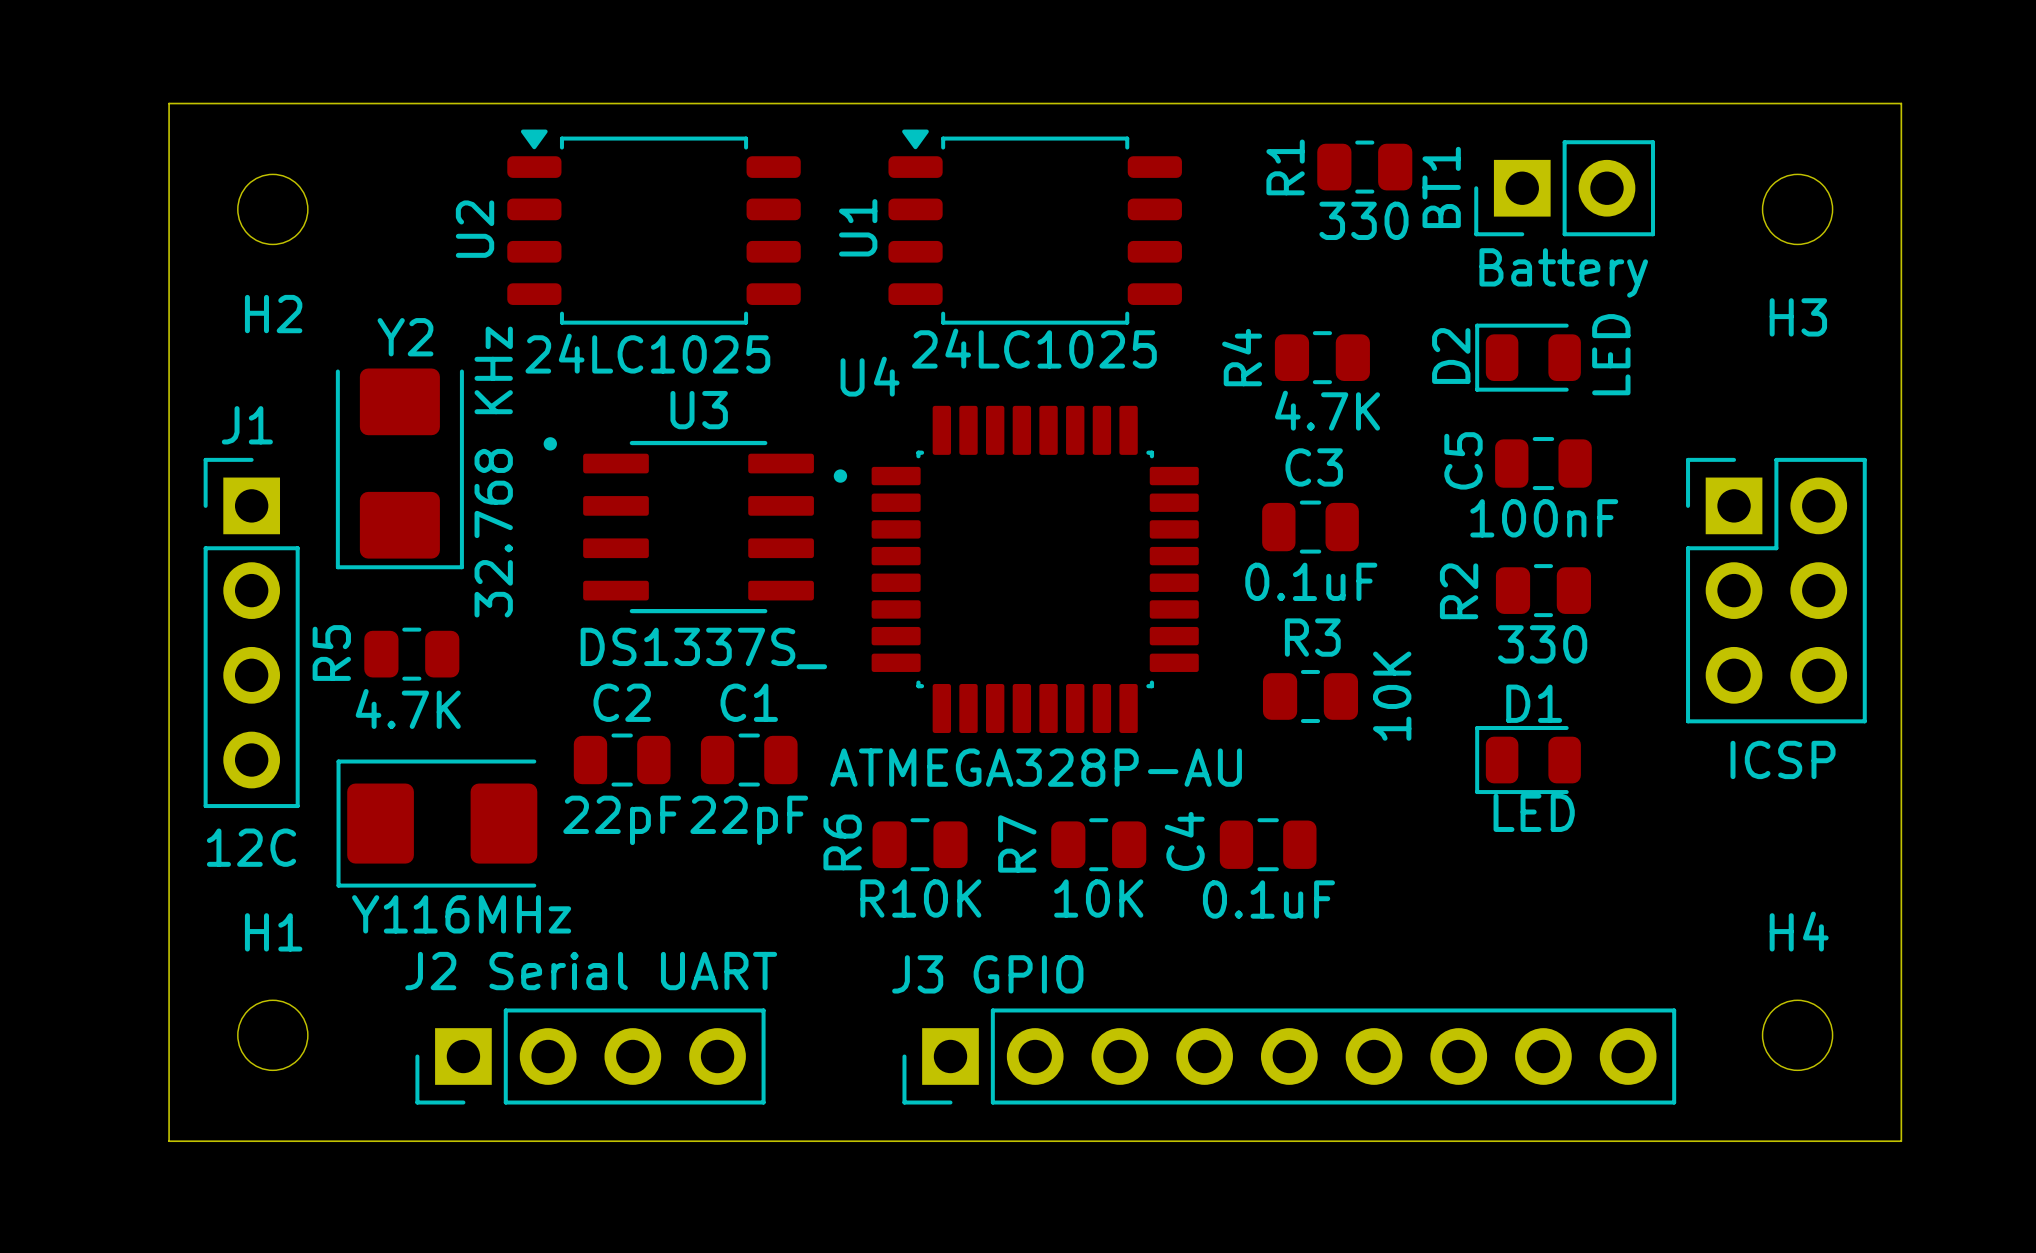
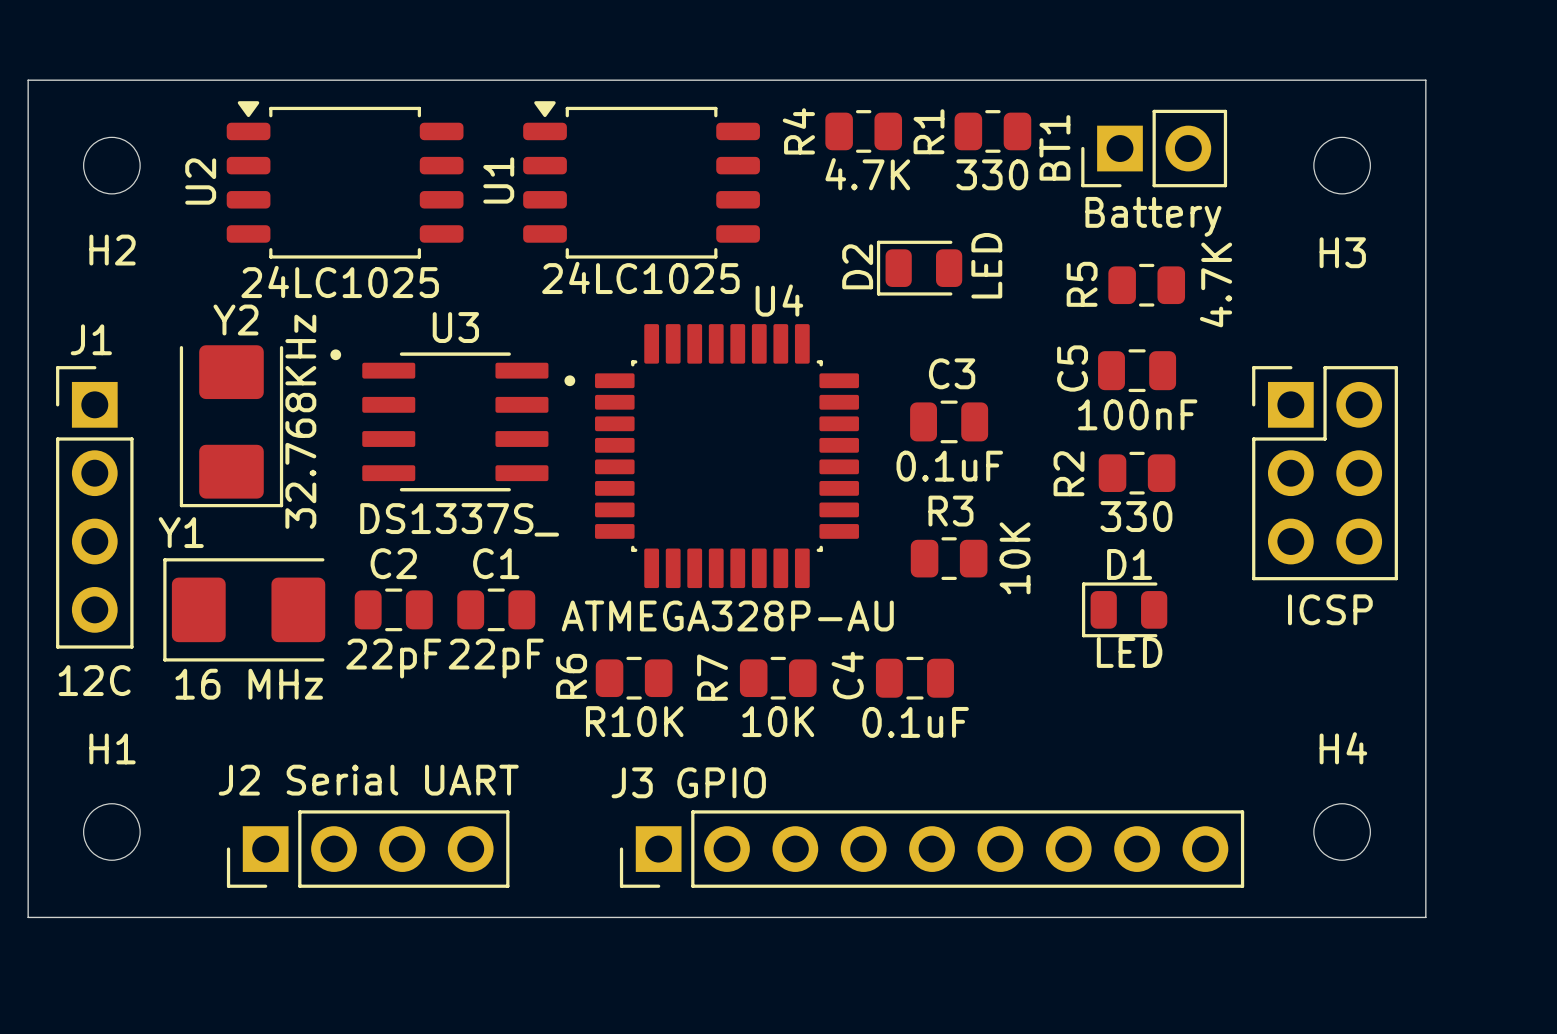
U2 position: (654, 227) -> (345, 179)
U1 position: (1035, 227) -> (641, 179)
R4 position: (1322, 357) -> (863, 131)
D2 position: (1528, 357) -> (919, 268)
U4 name position: U4 (870, 376) -> U4 (779, 300)
Y2 position: (399, 468) -> (231, 426)
Y2 value: 32.768 KHz (493, 472) -> 32.768KHz (300, 421)
R5 position: (411, 654) -> (1146, 285)
R5 value rotation: 0° (408, 708) -> 90° counterclockwise (1216, 284)
Y1 position: (436, 823) -> (244, 609)
Y1 name position: Y1 (379, 914) -> Y1 (181, 532)
Y1 value: 16MHz (492, 914) -> 16 MHz (249, 684)

